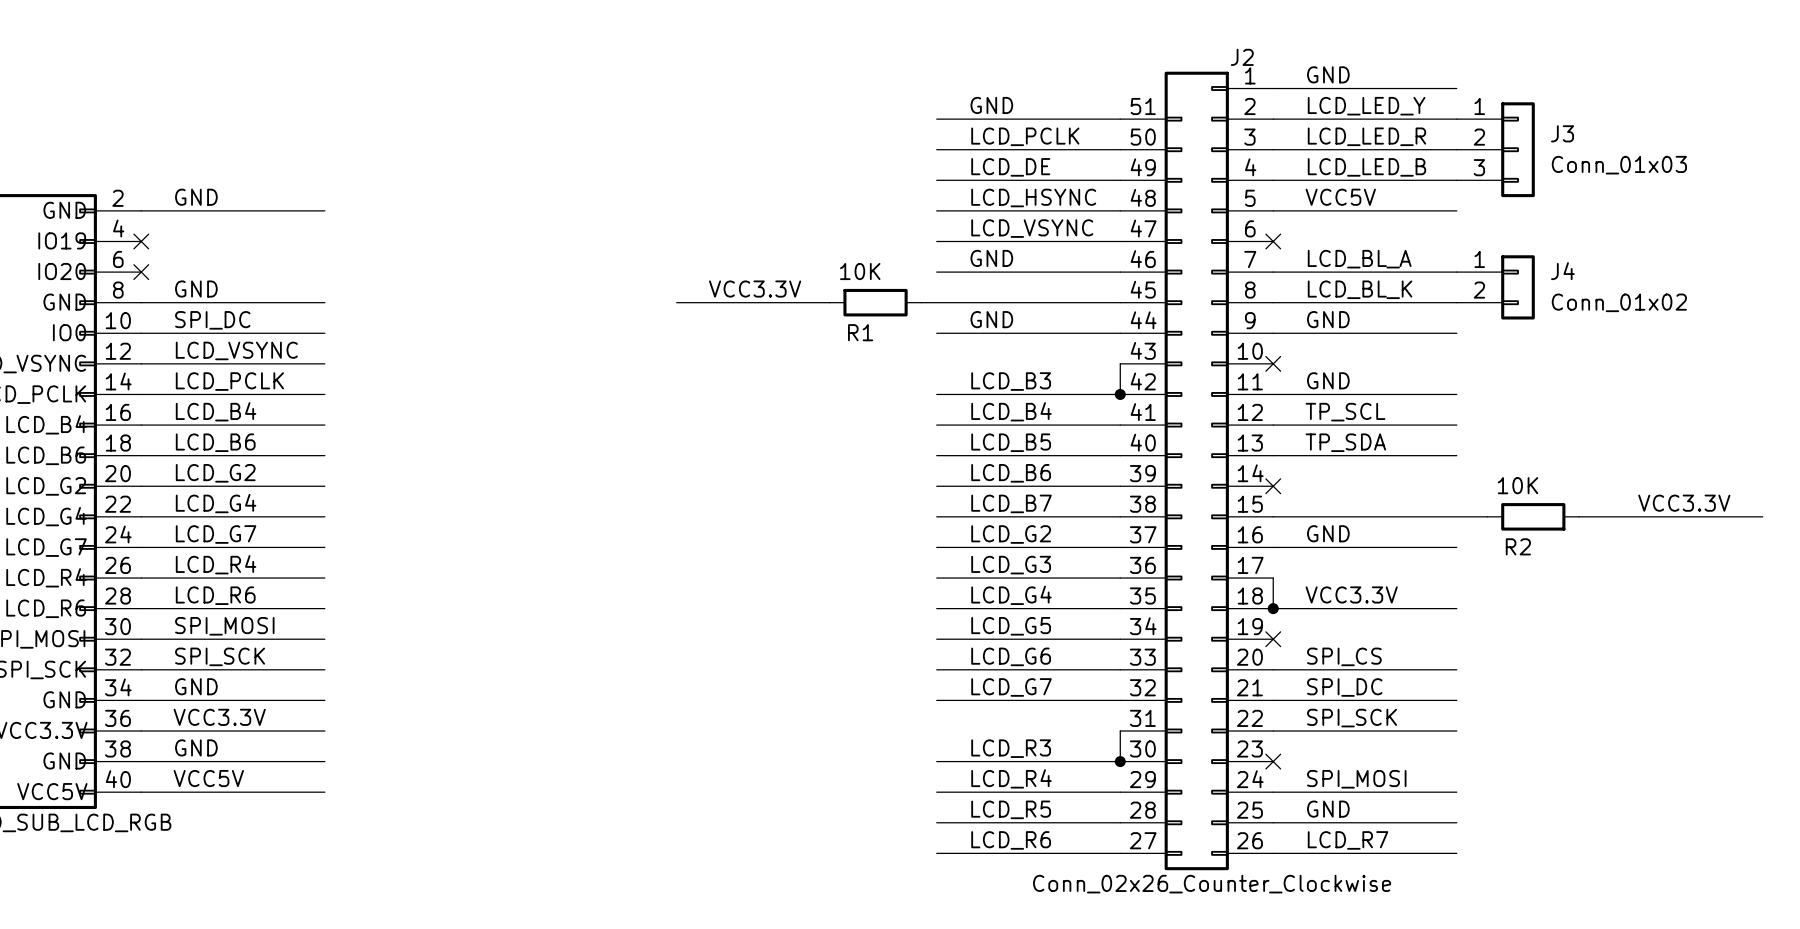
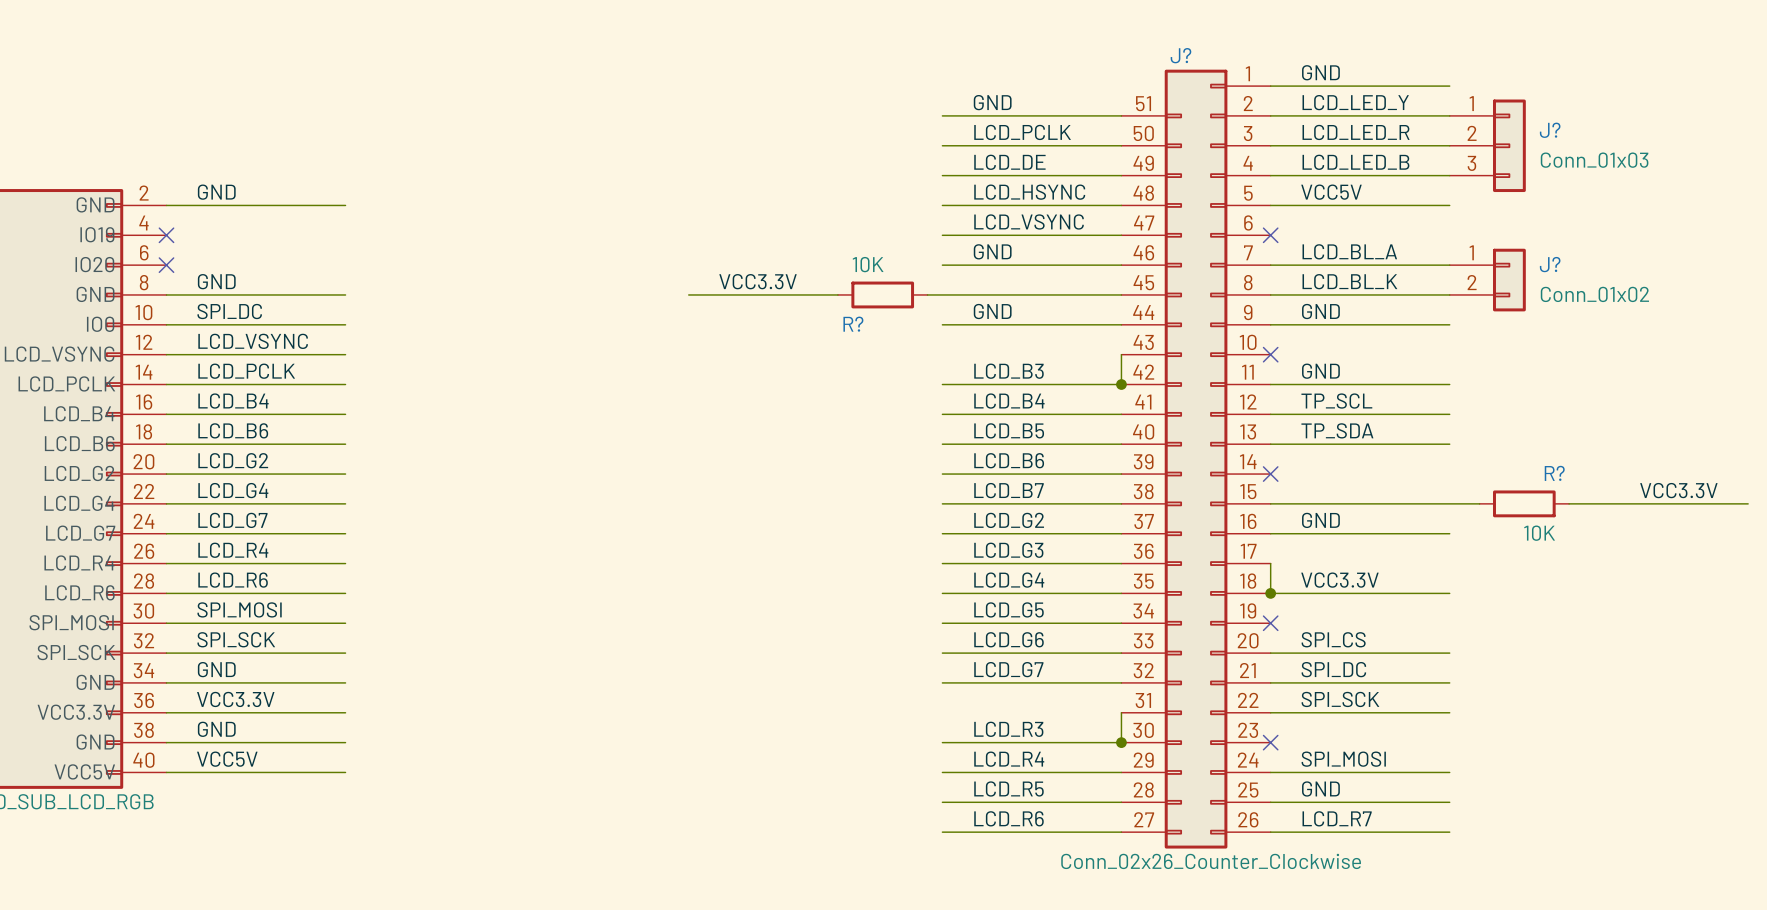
J2 name: J2 (1242, 57) -> J? (1180, 55)
J3 name: J3 (1562, 133) -> J? (1550, 130)
J4 name: J4 (1562, 271) -> J? (1550, 264)
R1 name: R1 (860, 332) -> R? (853, 324)
R2 value position: 10K (1518, 485) -> 10K (1539, 533)
R2 name: R2 (1518, 546) -> R? (1554, 473)

